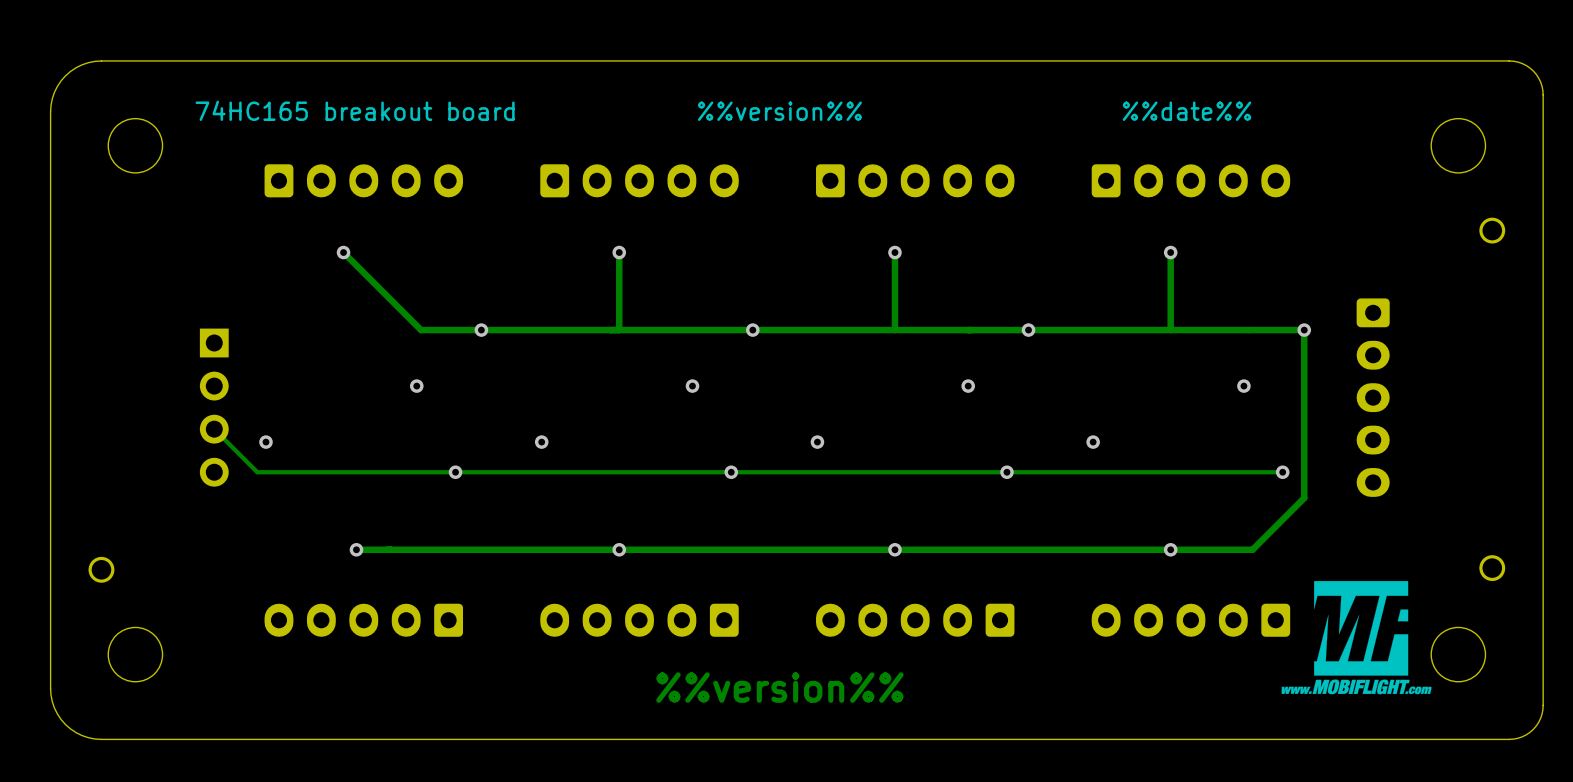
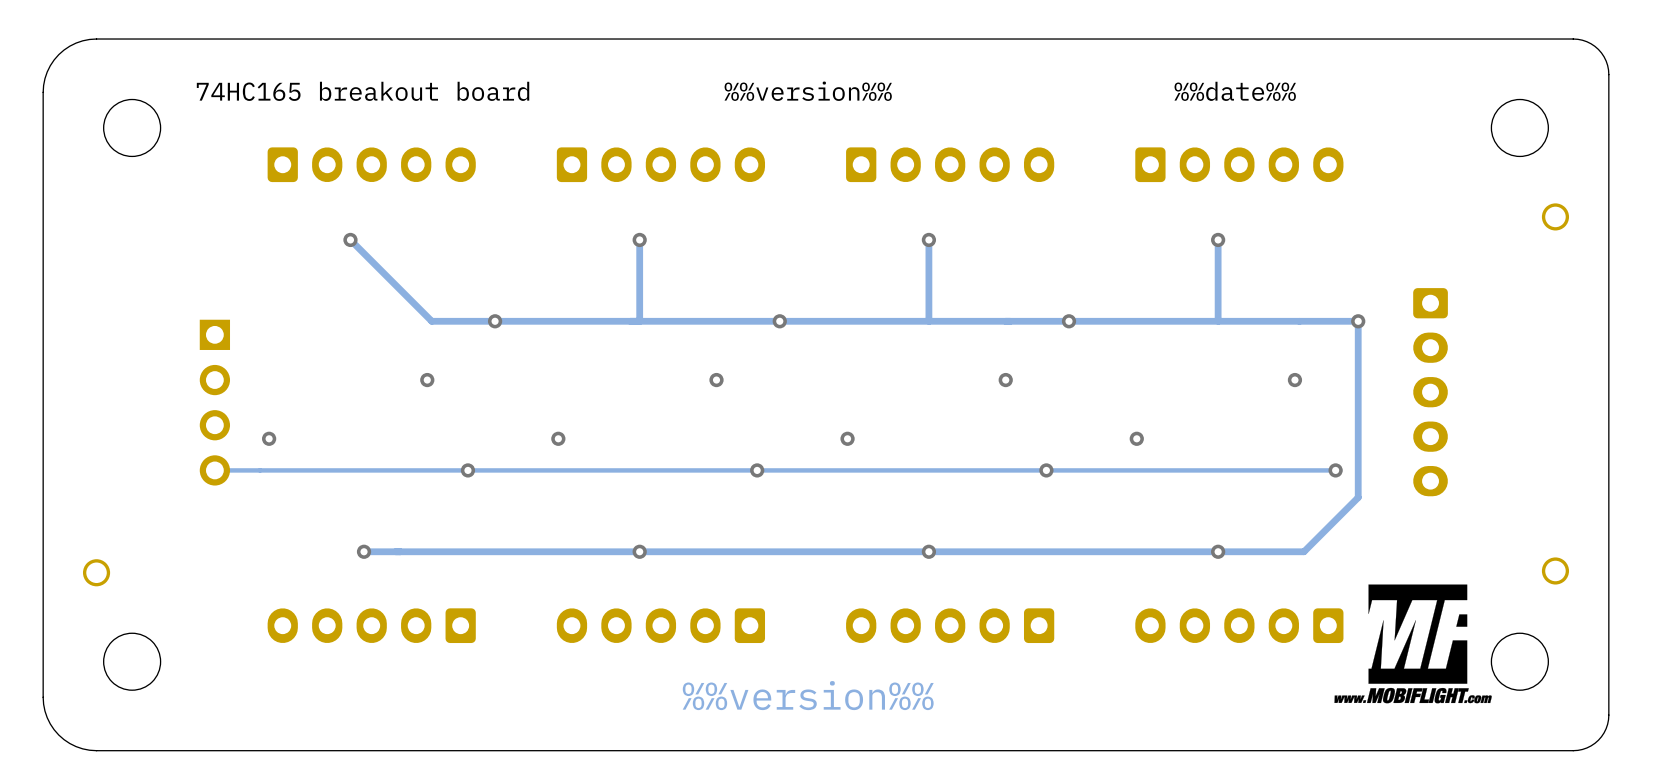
track: (214, 429) (257, 472) -> (214, 470) (260, 470)

